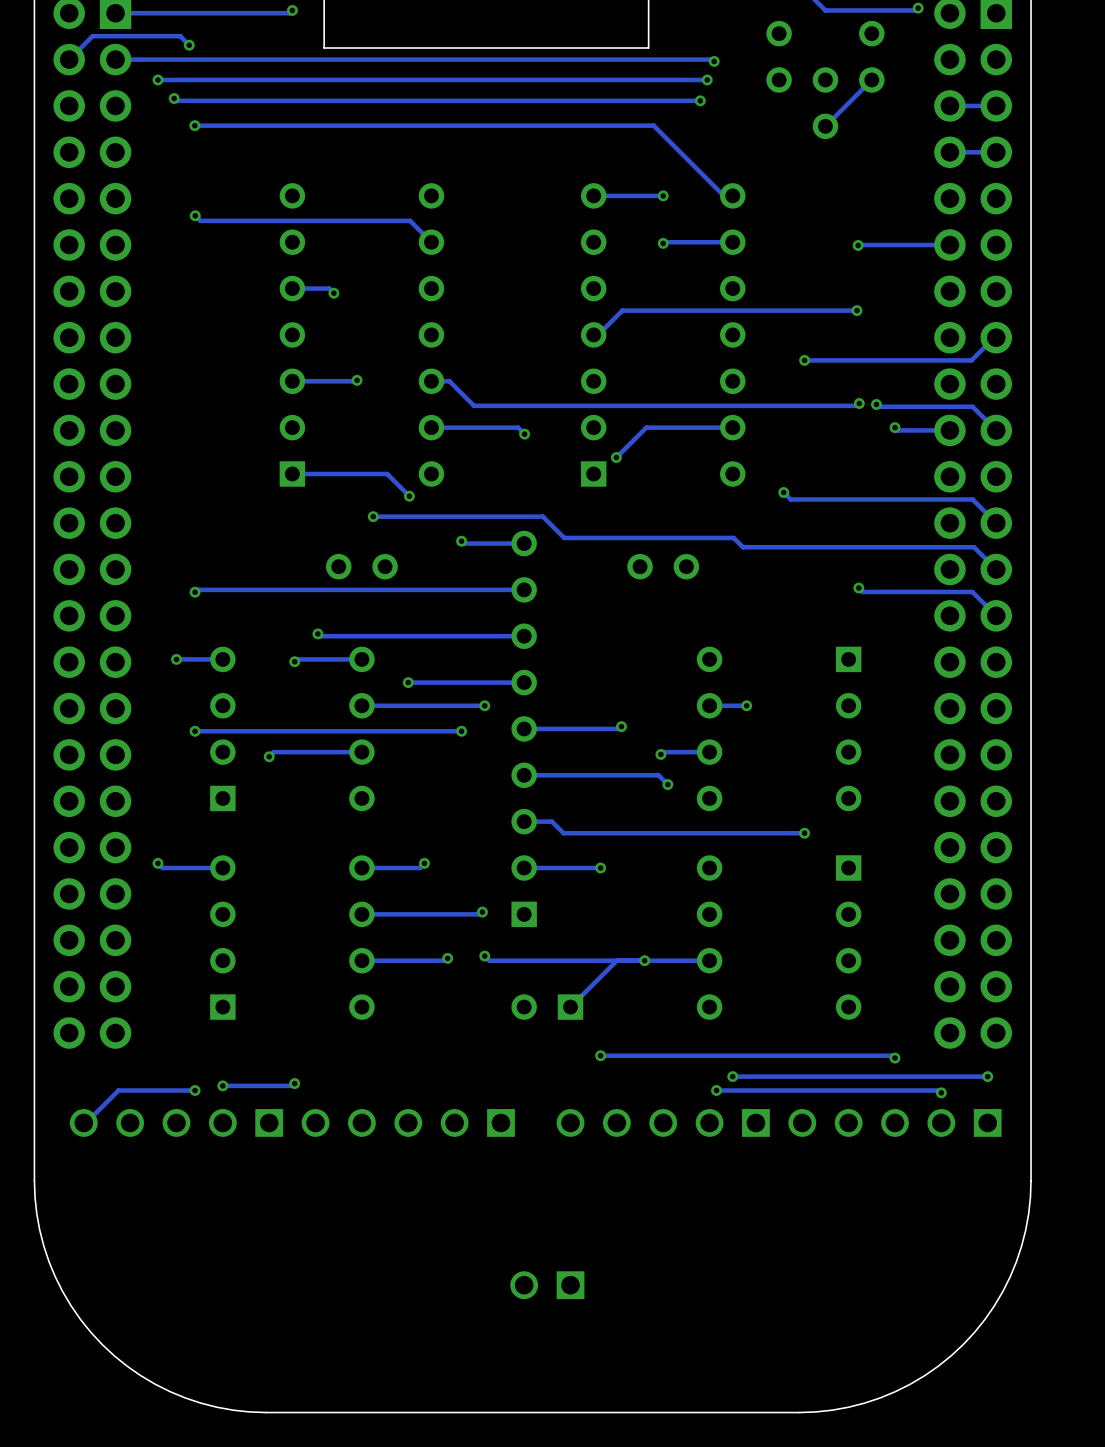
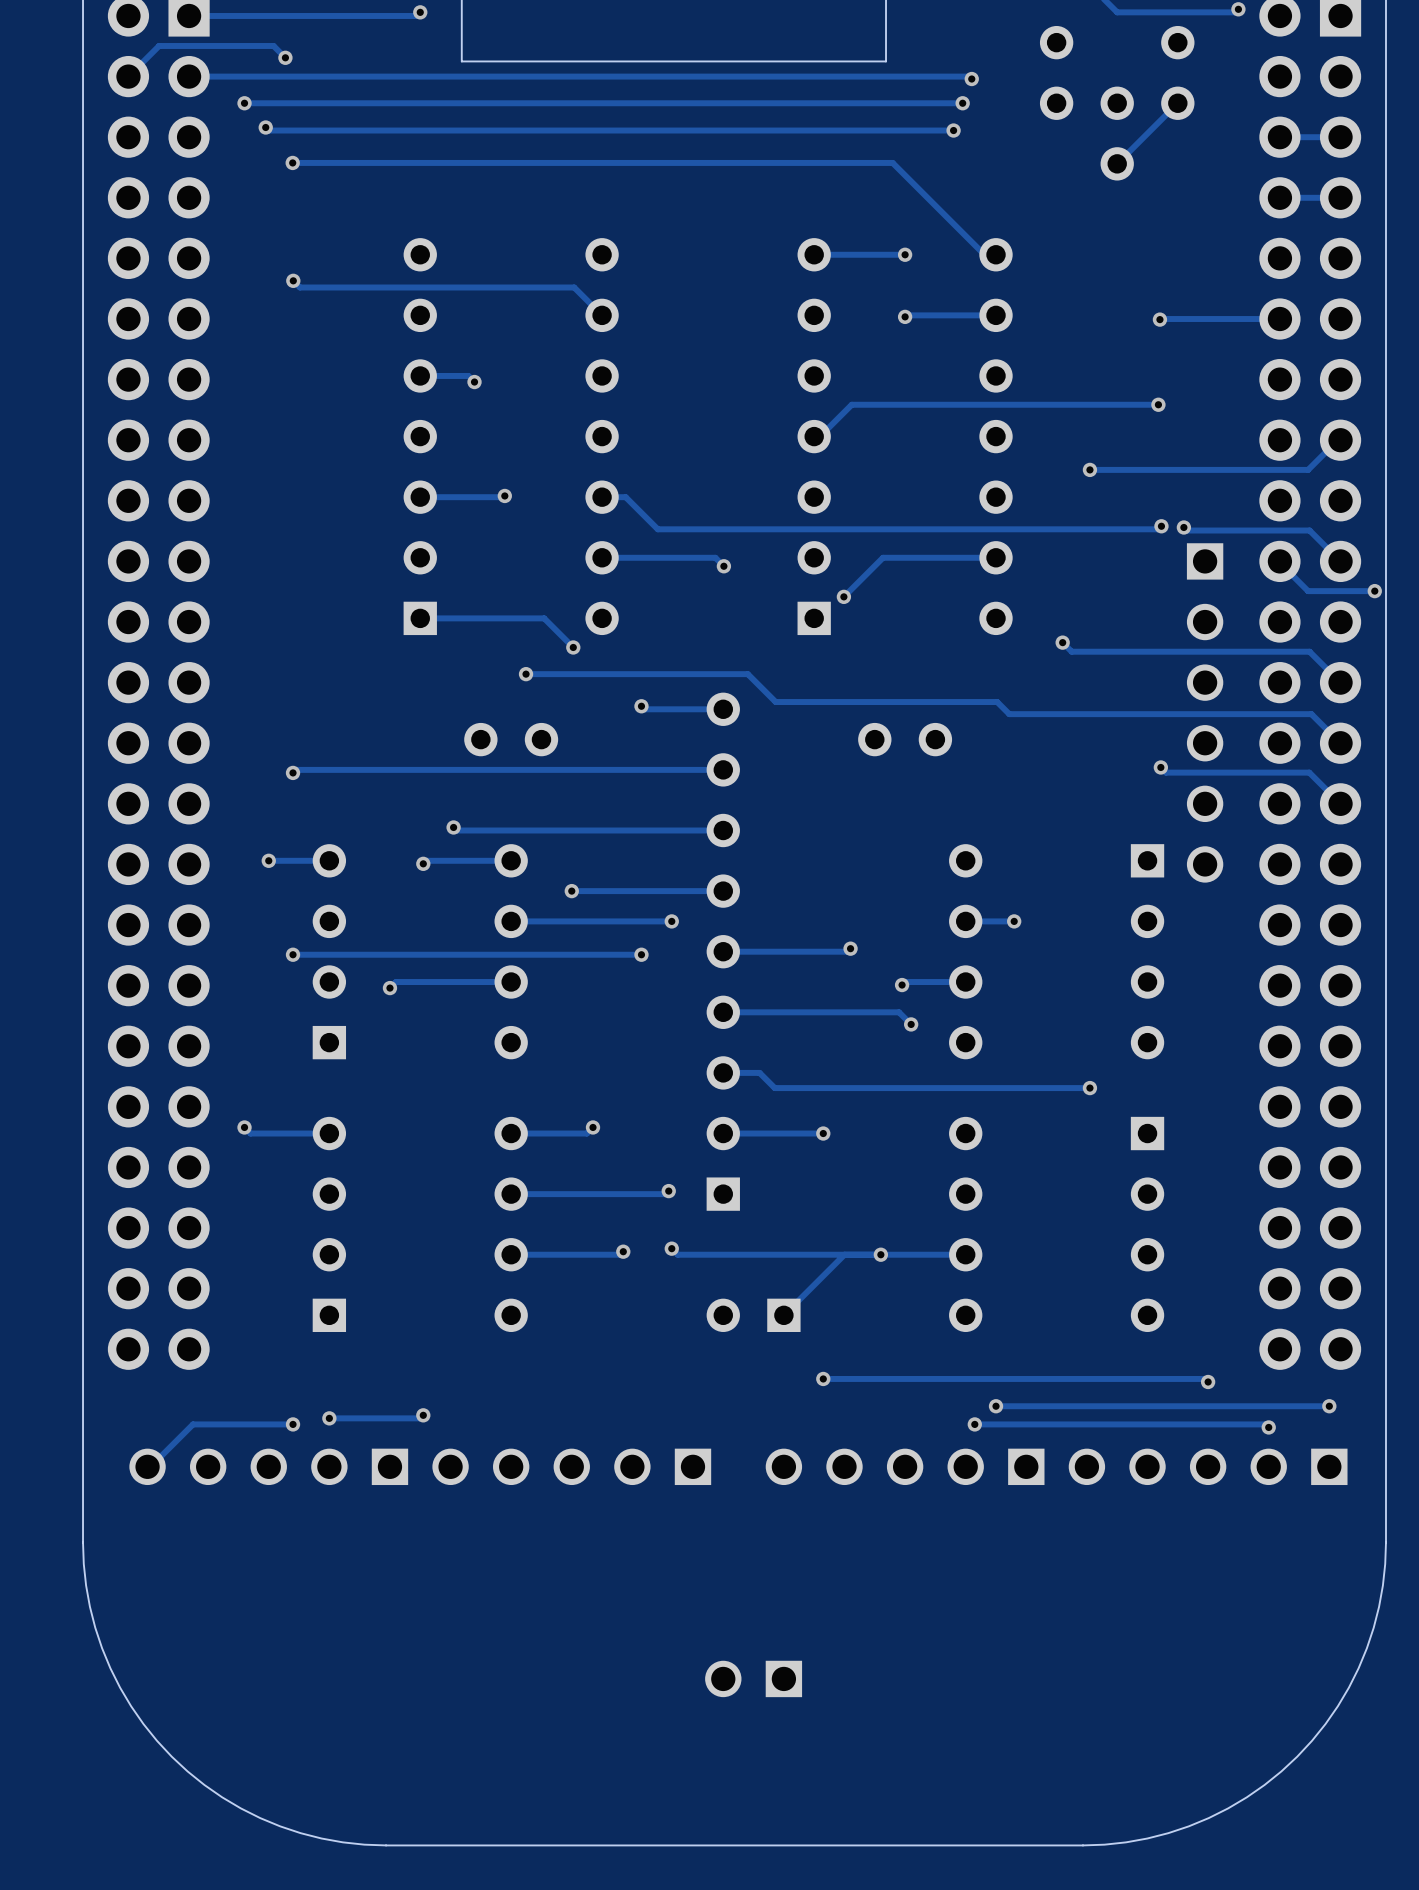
track: (895, 427) (897, 430) (949, 430) -> (1374, 591) (1308, 591) (1279, 561)
via: (895, 427) -> none
via: none -> (1374, 591)
part: none -> (1205, 712)

